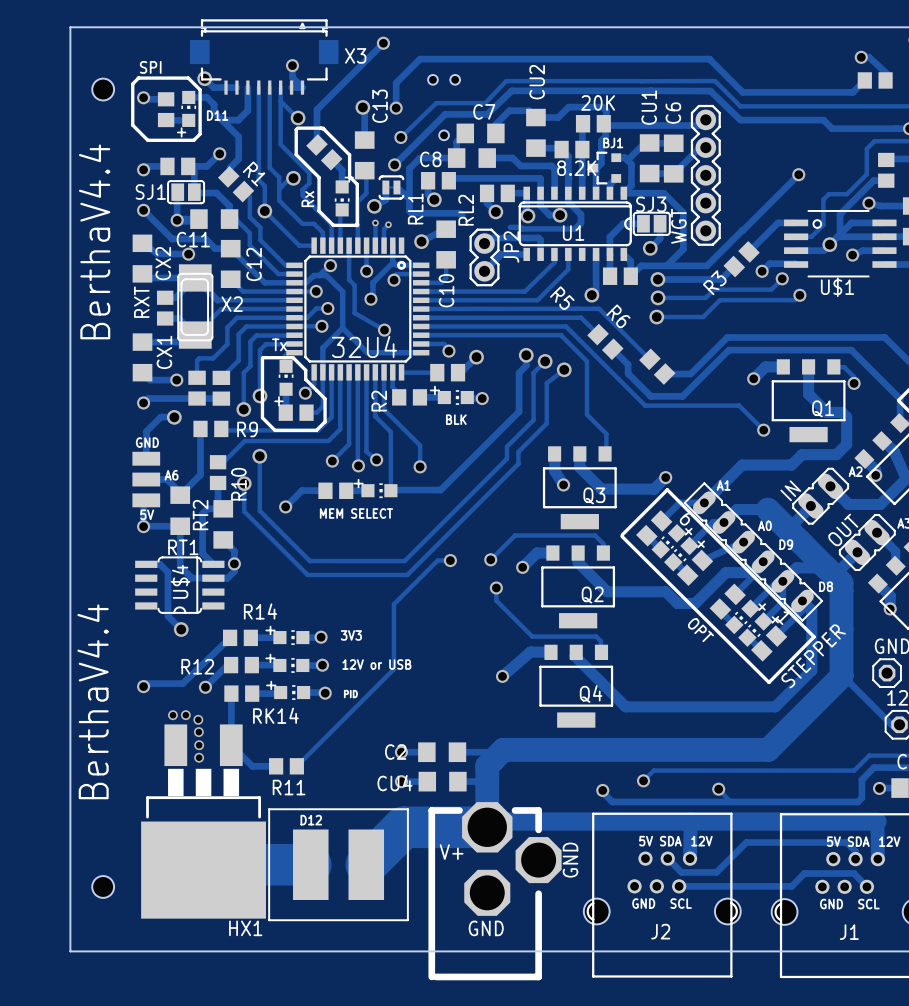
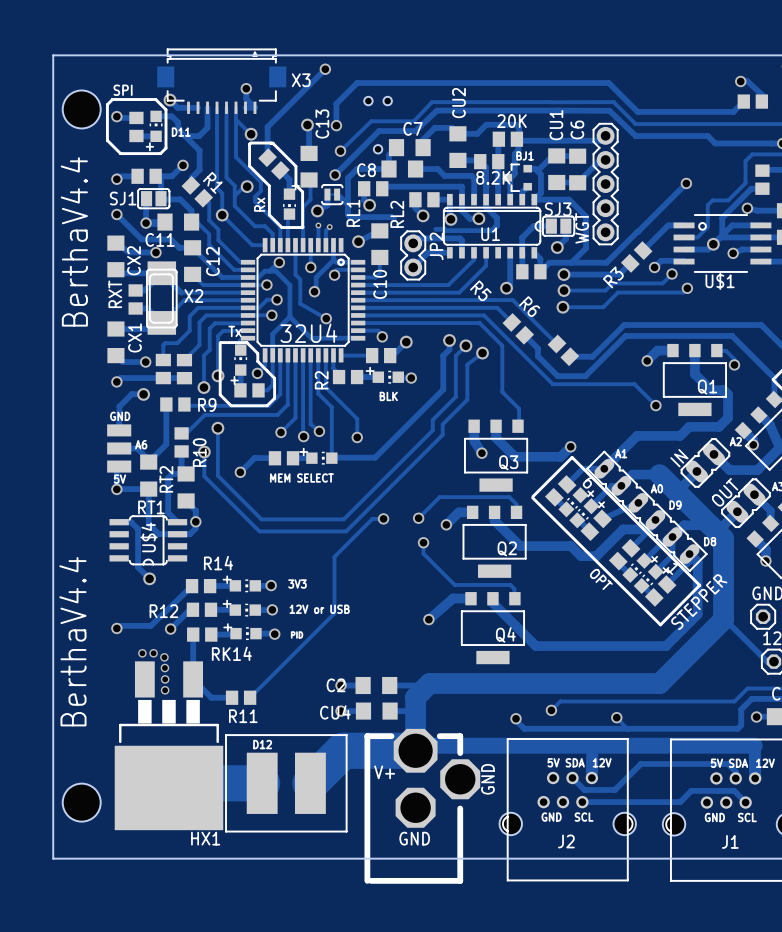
hole size: [92, 78, 115, 101] -> [62, 90, 101, 129]
hole size: [92, 876, 115, 898] -> [62, 783, 101, 822]

